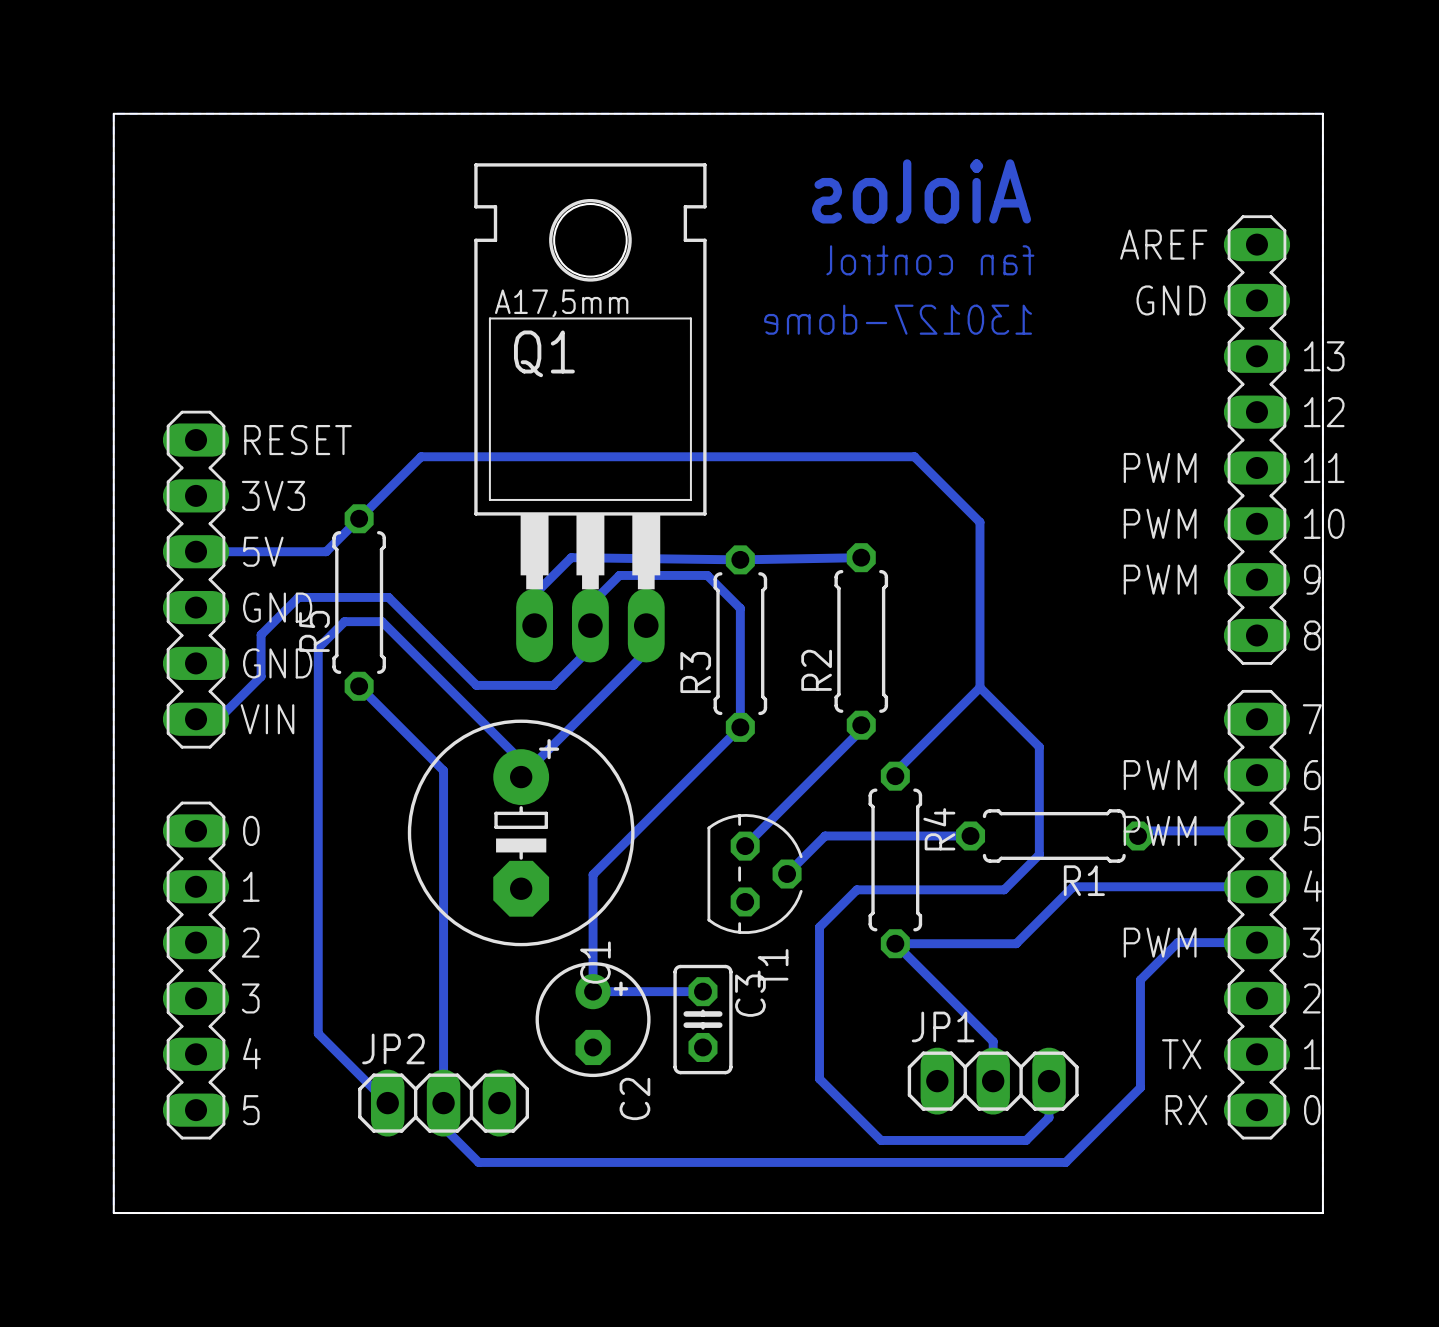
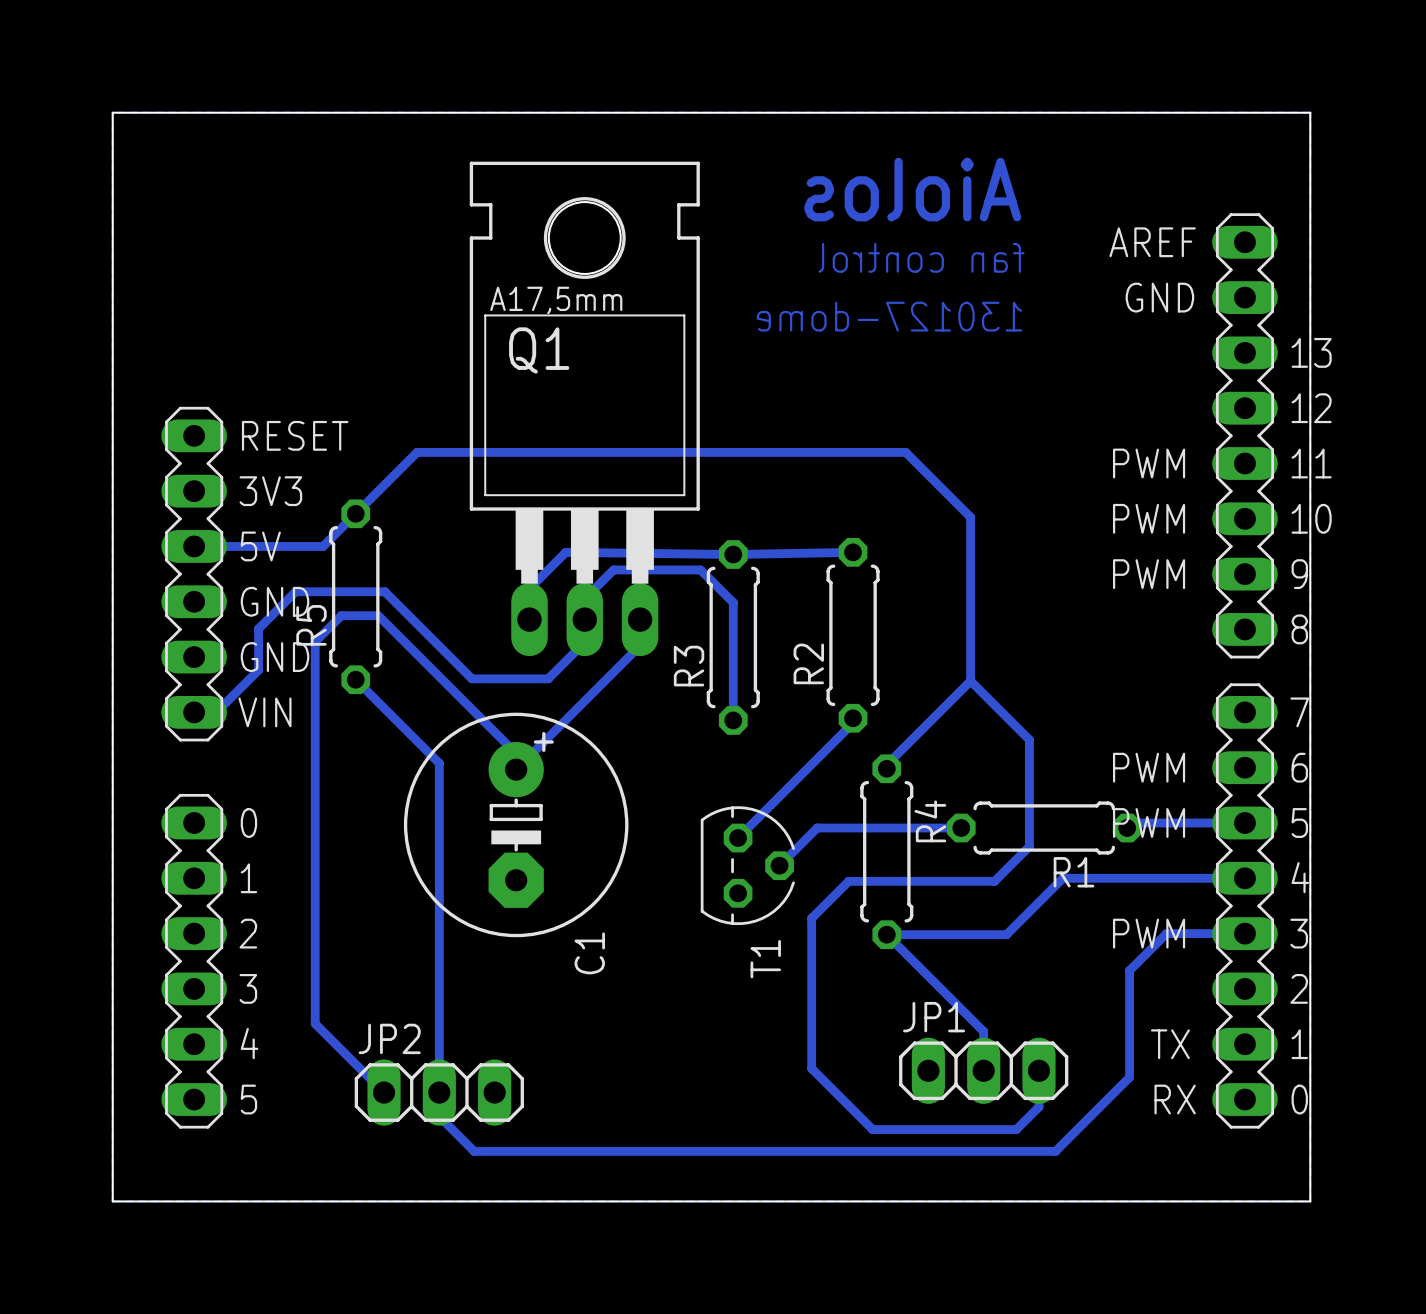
bottom track: (740, 727) (593, 874) (593, 991) (702, 991) -> none
C2: (593, 1019) -> none
C3: (702, 1019) -> none

